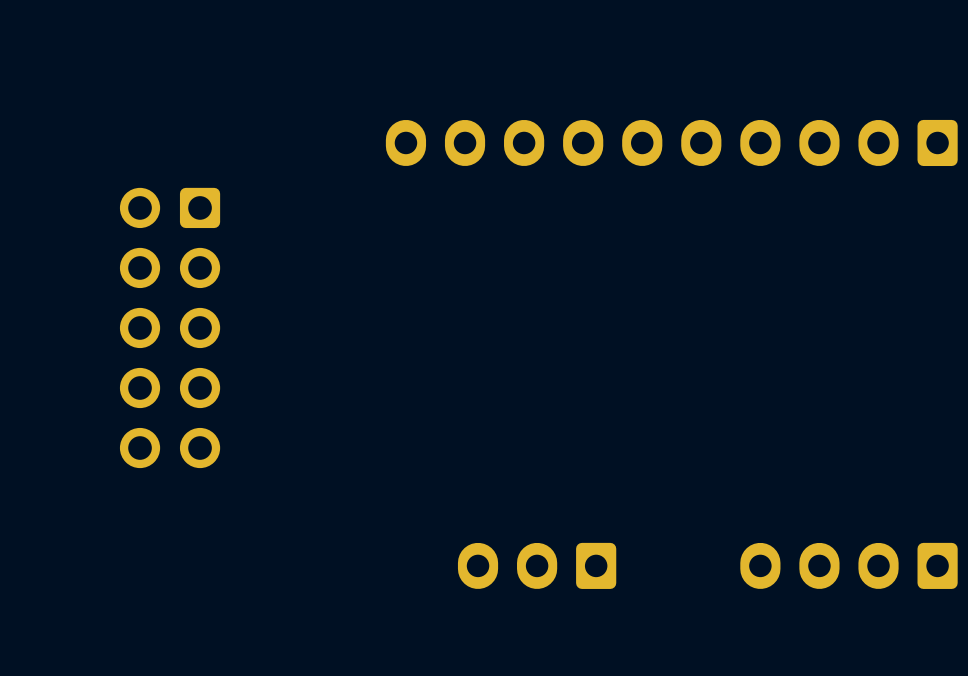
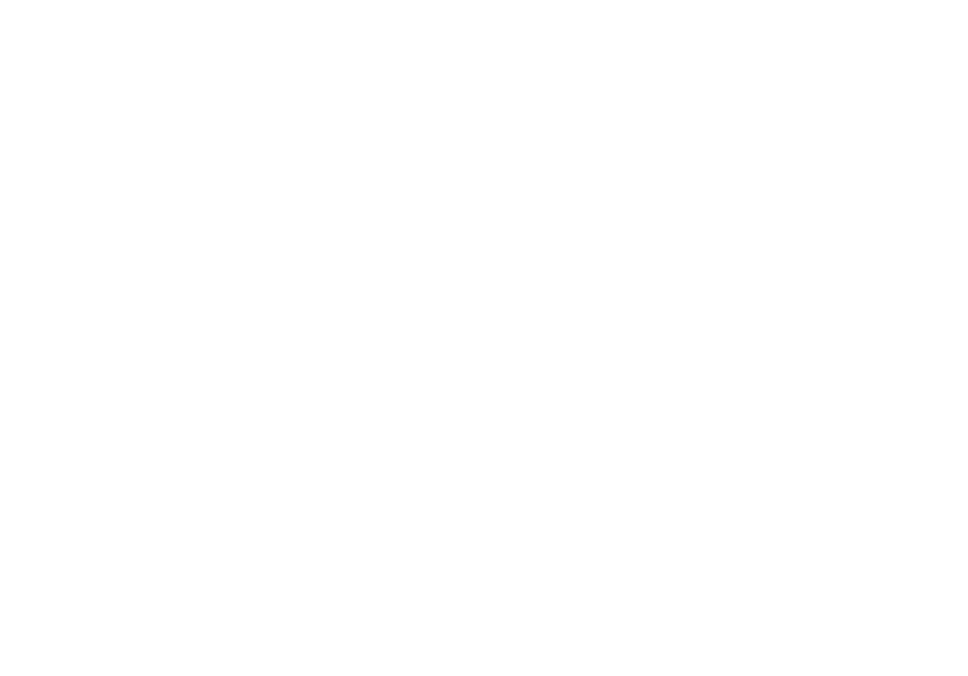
part: (671, 142) -> none
part: (170, 327) -> none
part: (537, 565) -> none
part: (848, 565) -> none

